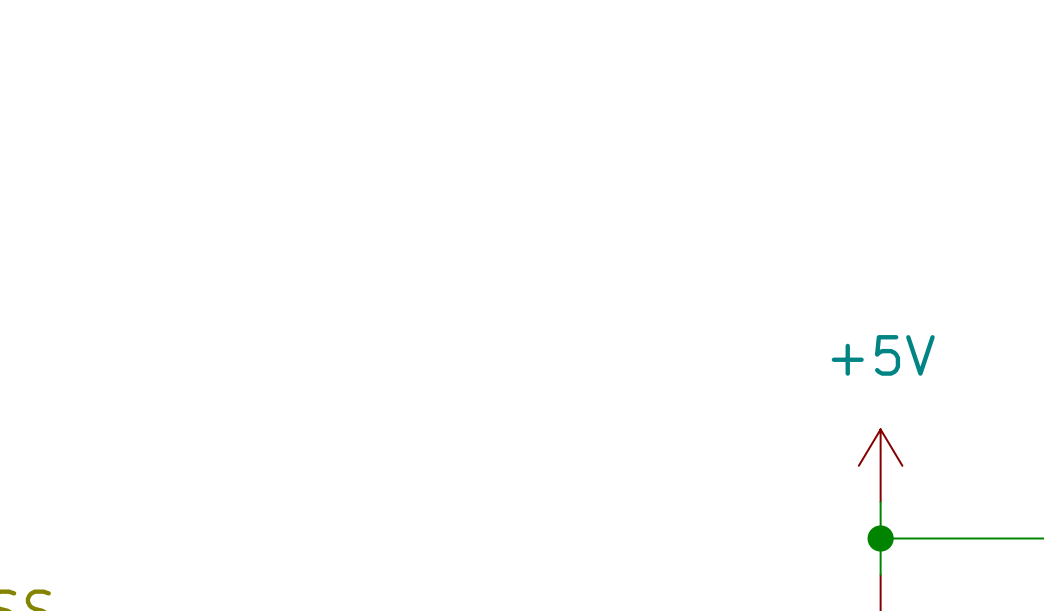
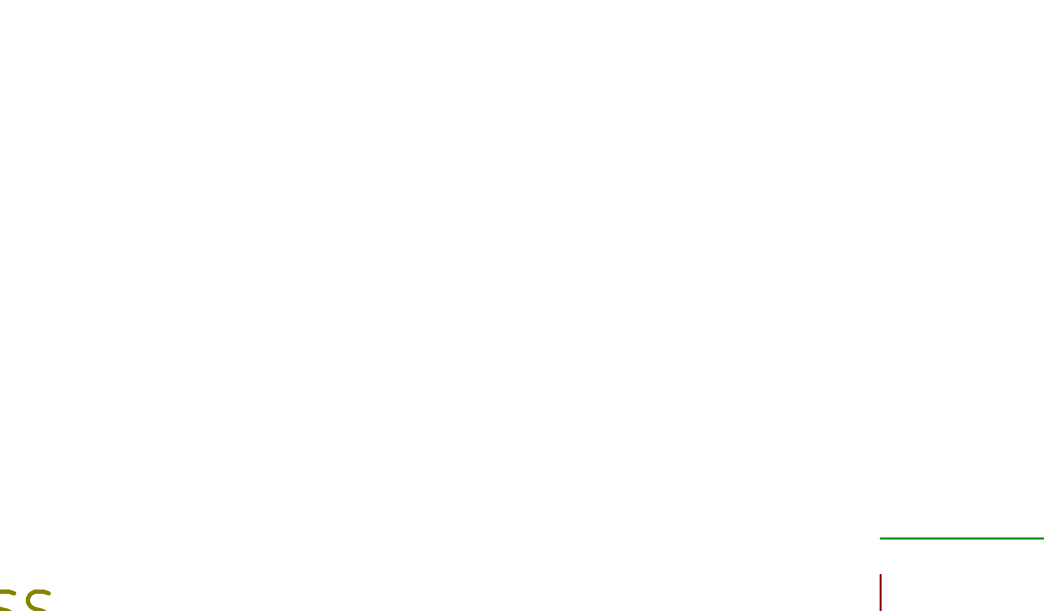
power symbol: +5V (880, 465) -> none
wire: (880, 502) (880, 574) -> none
junction: (880, 538) -> none

